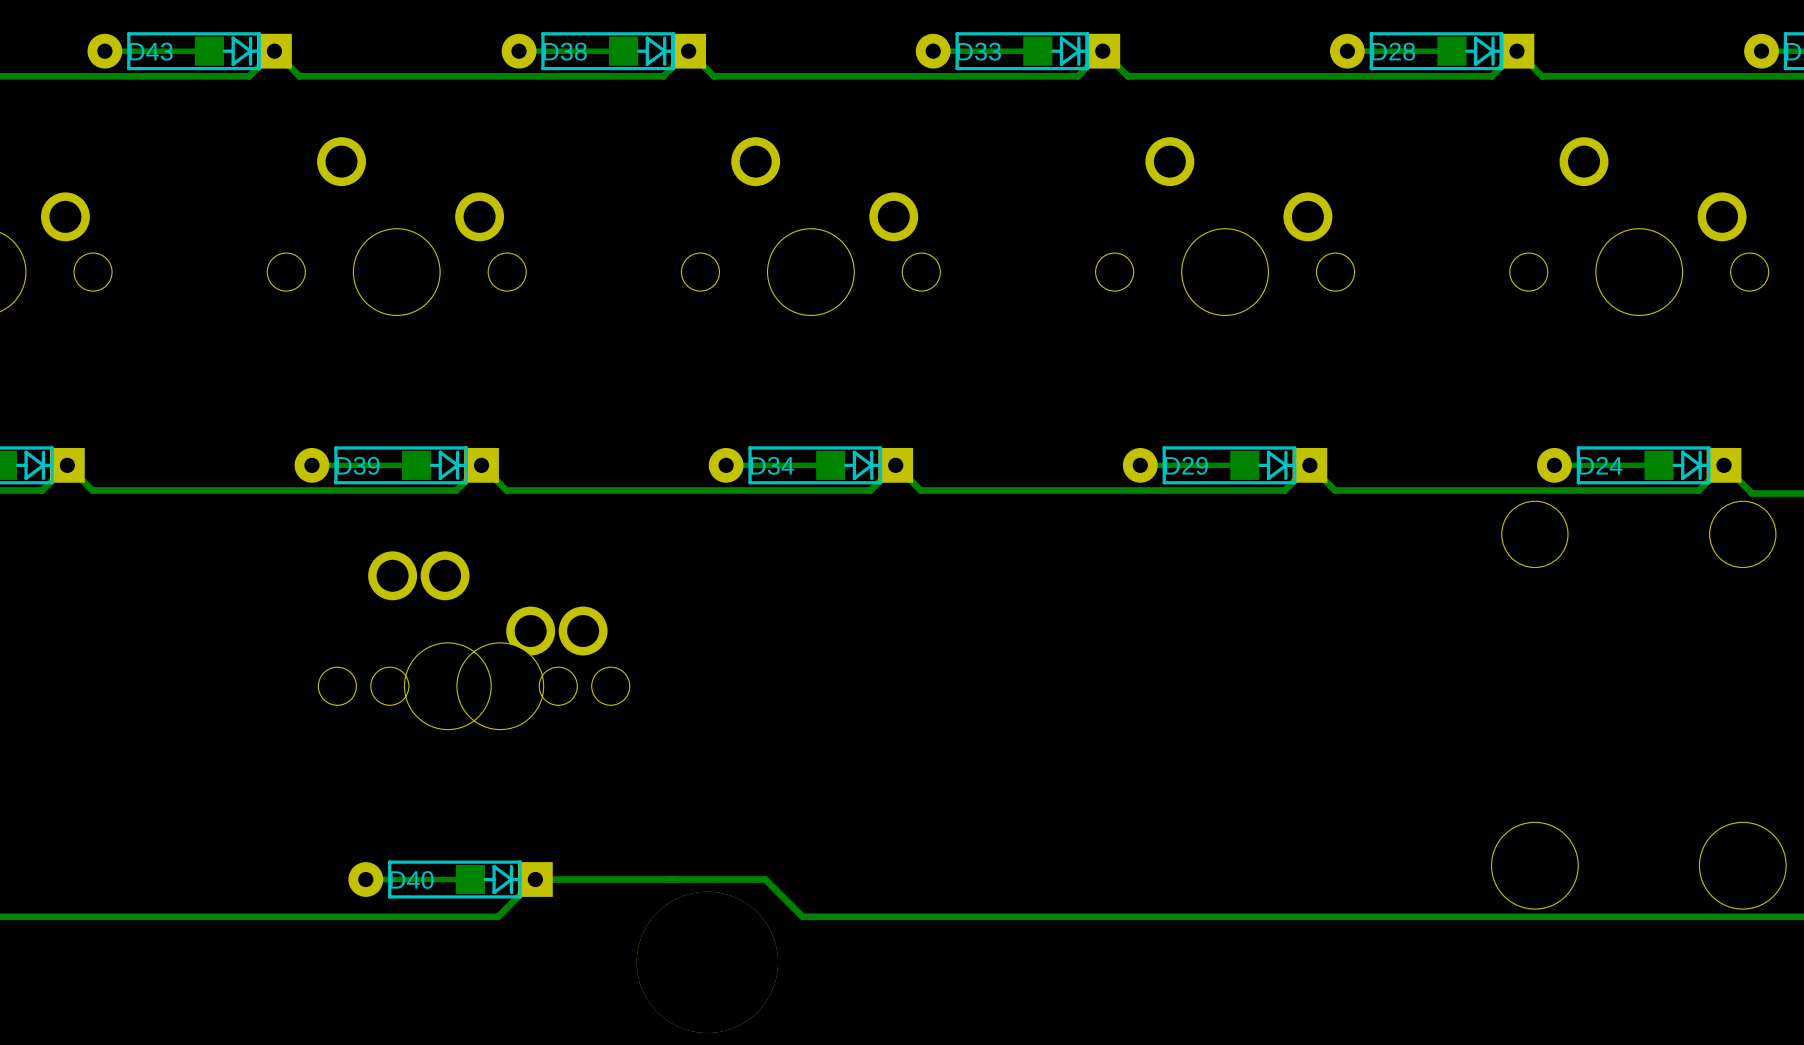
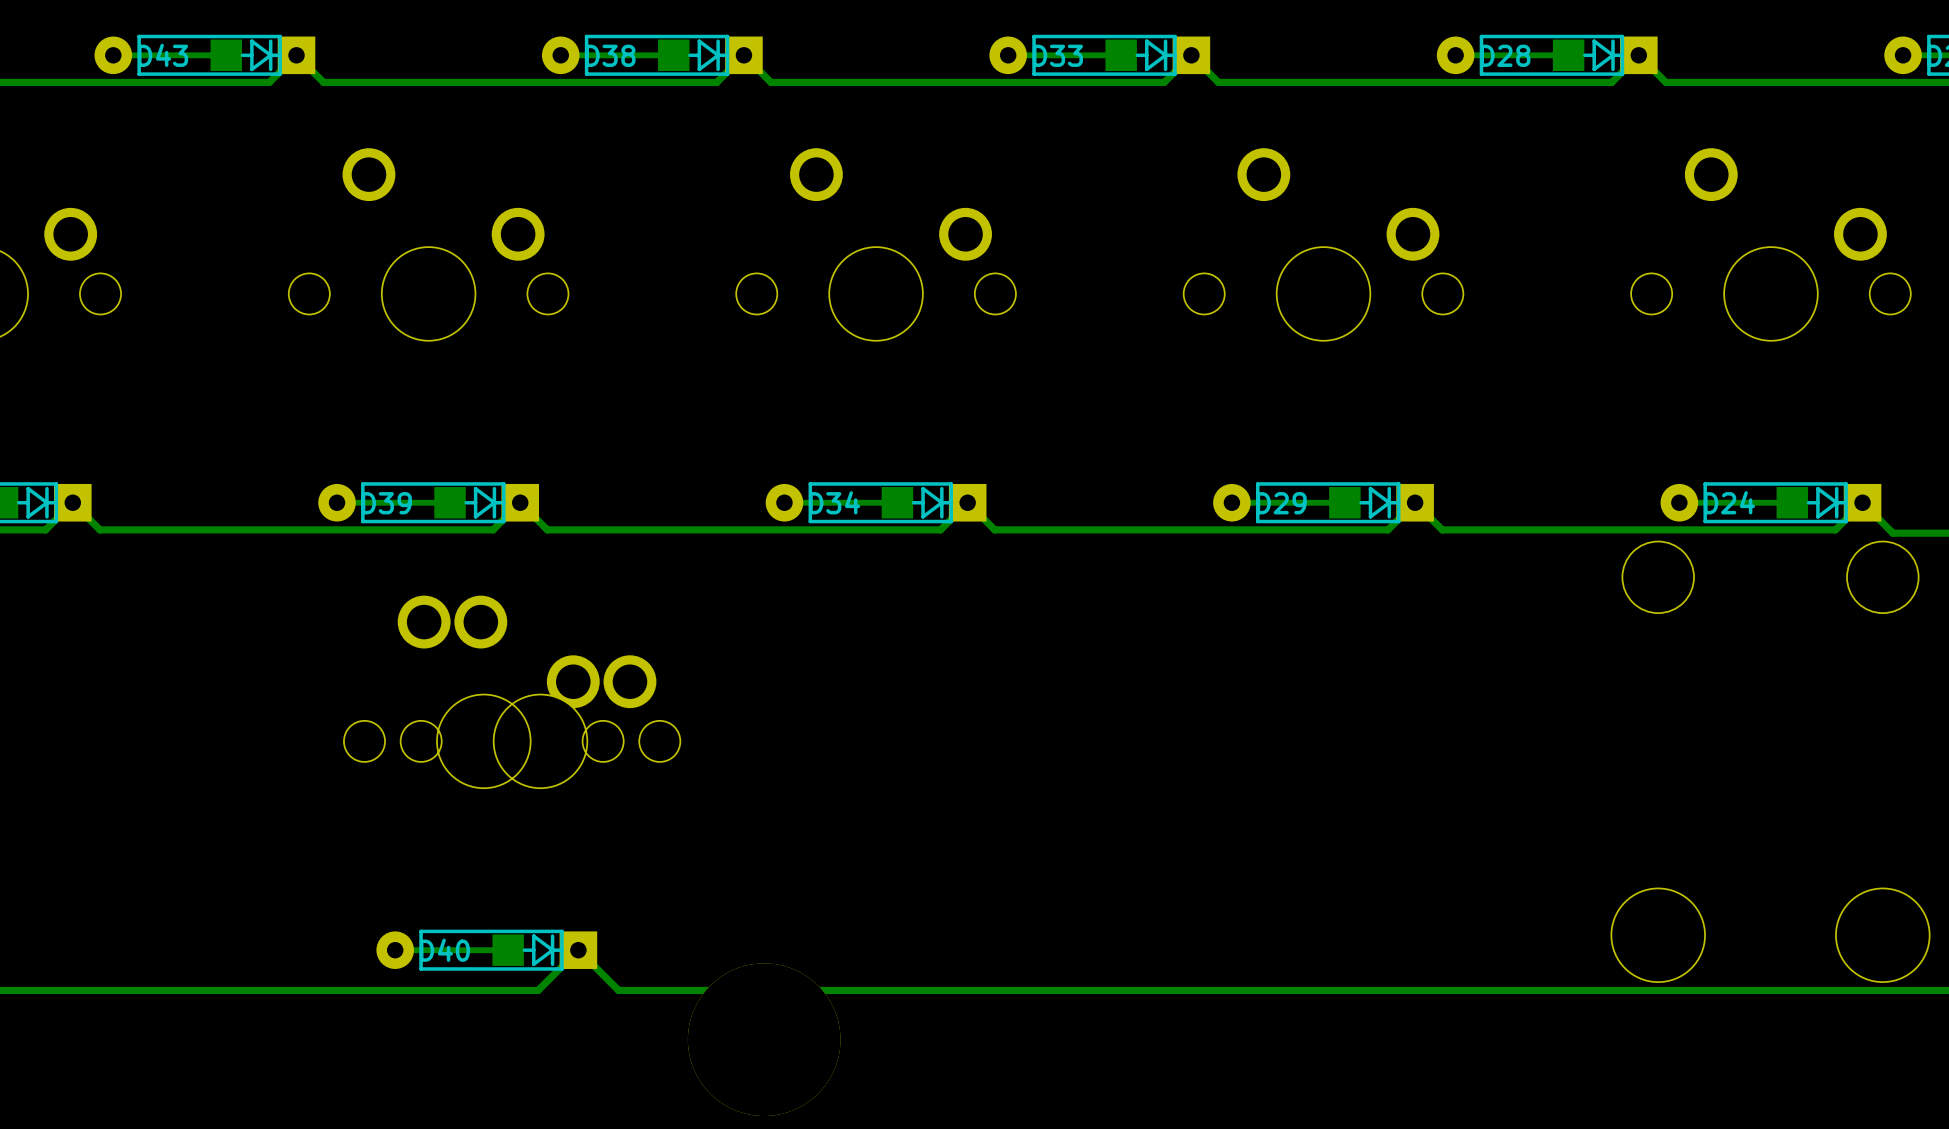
track: (535, 879) (765, 879) (802, 916) -> (578, 950) (618, 990) (867, 990)

